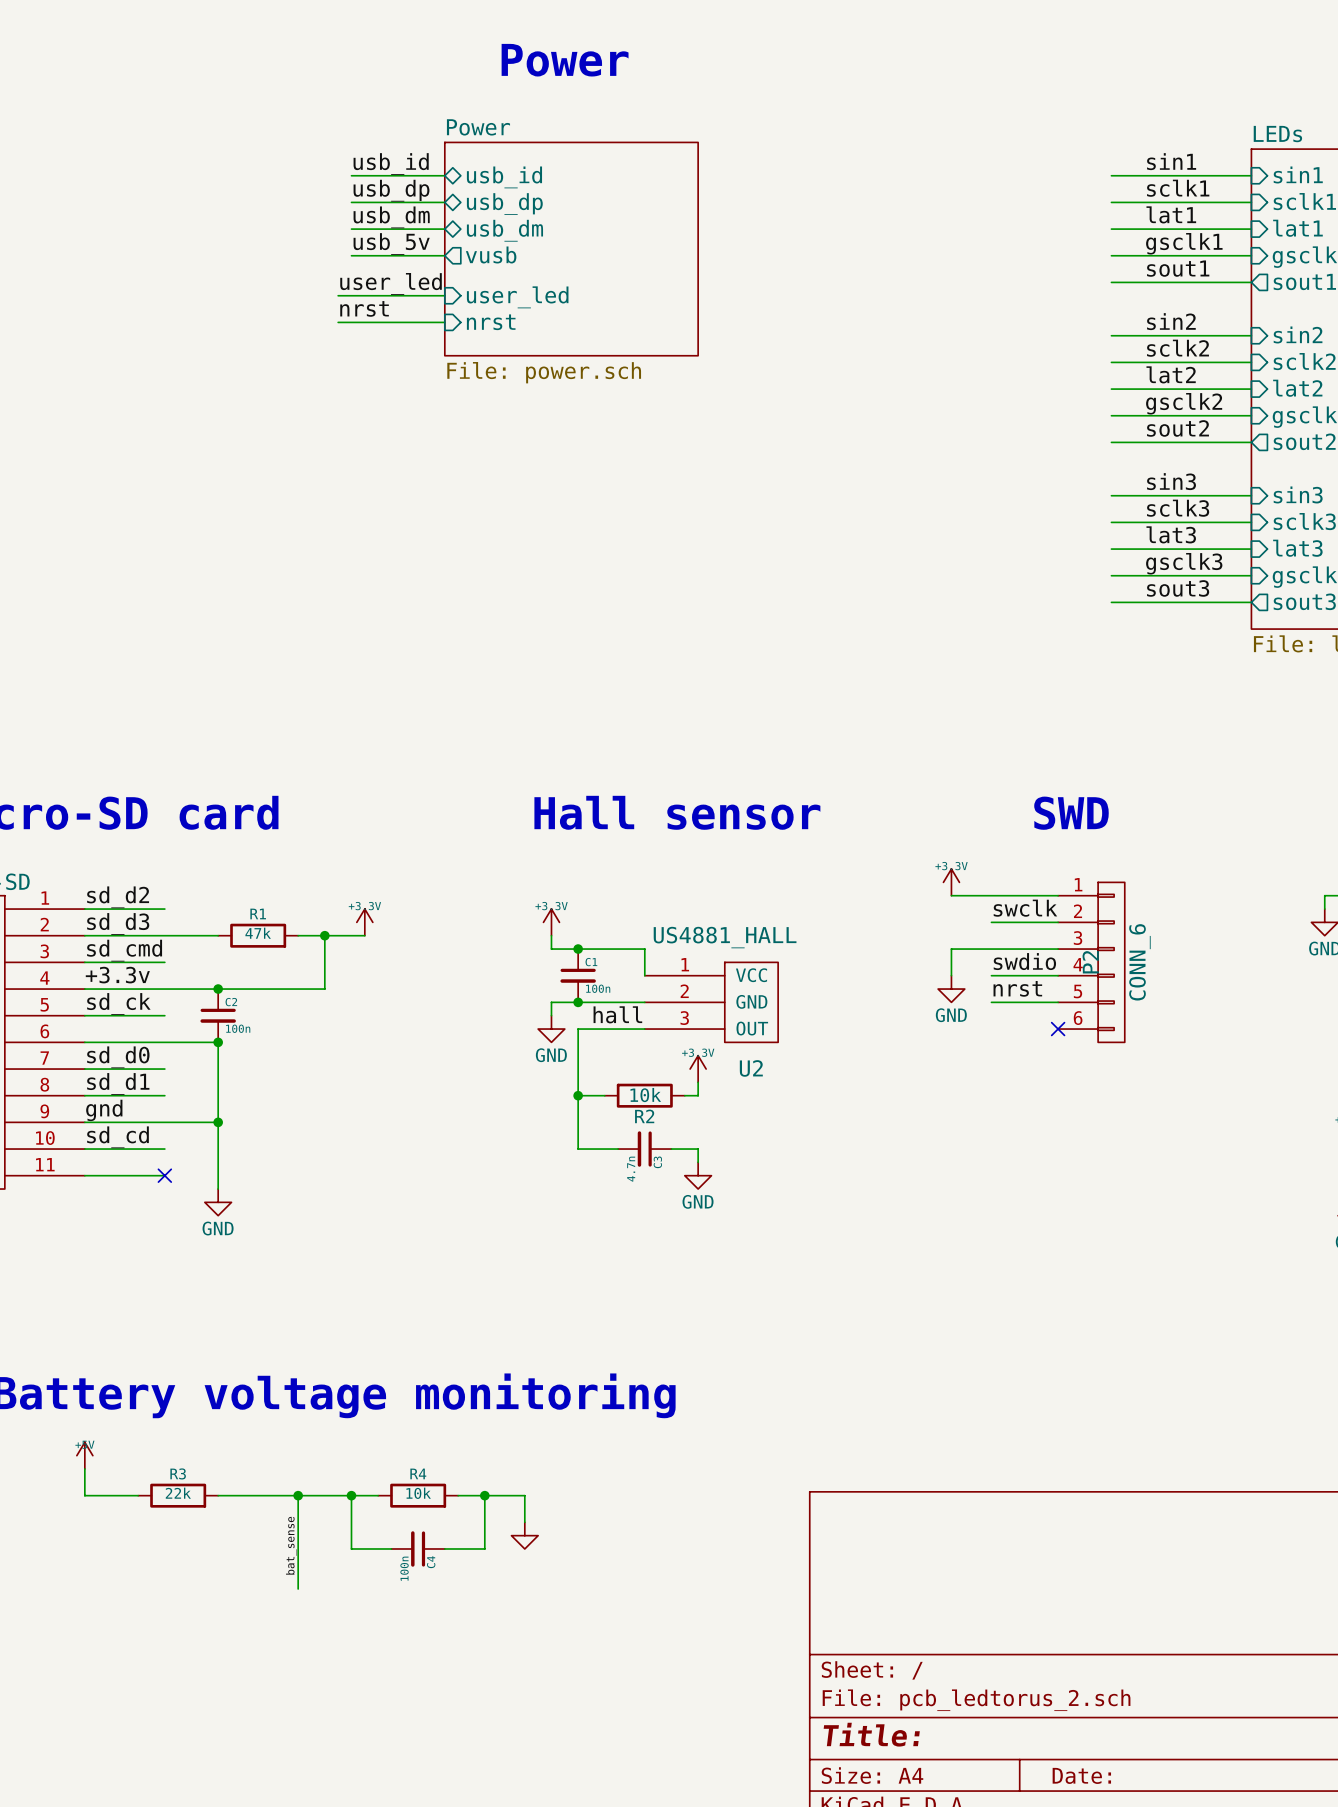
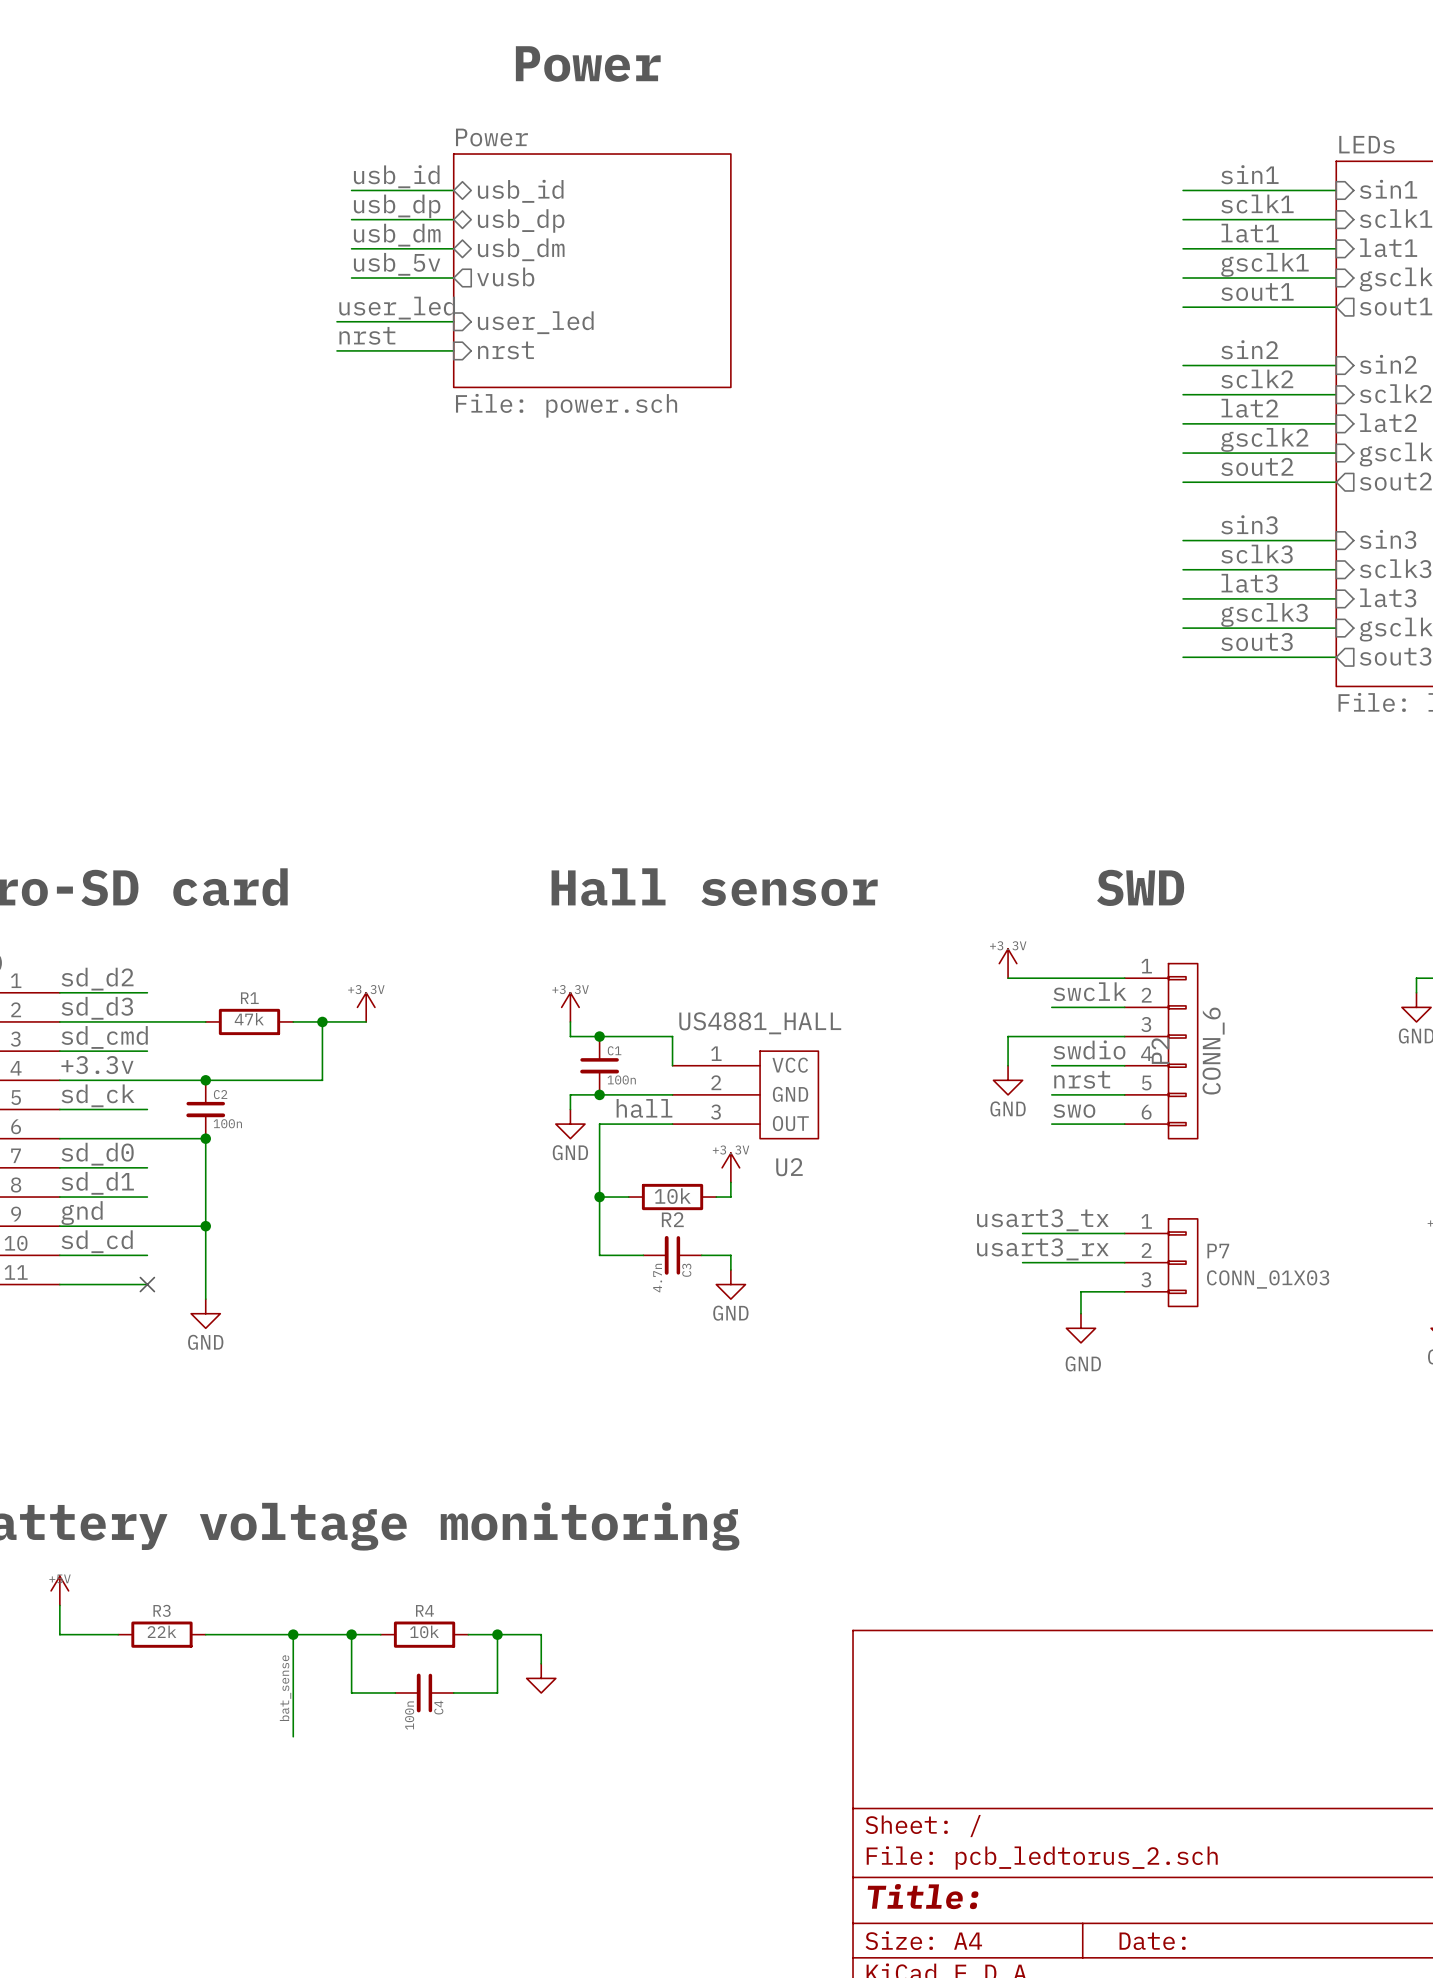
label: none -> swo (1074, 1111)
wire: none -> (1051, 1124) (1124, 1124)
no-connect mark: (1058, 1029) -> none
label: none -> usart3_tx (1042, 1220)
wire: none -> (1022, 1233) (1124, 1233)
label: none -> usart3_rx (1042, 1249)
wire: none -> (1022, 1262) (1124, 1262)
P7: none -> CONN_01X03 (1161, 1262)
wire: none -> (1124, 1291) (1080, 1291) (1080, 1313)
power symbol: none -> GND (1080, 1328)

